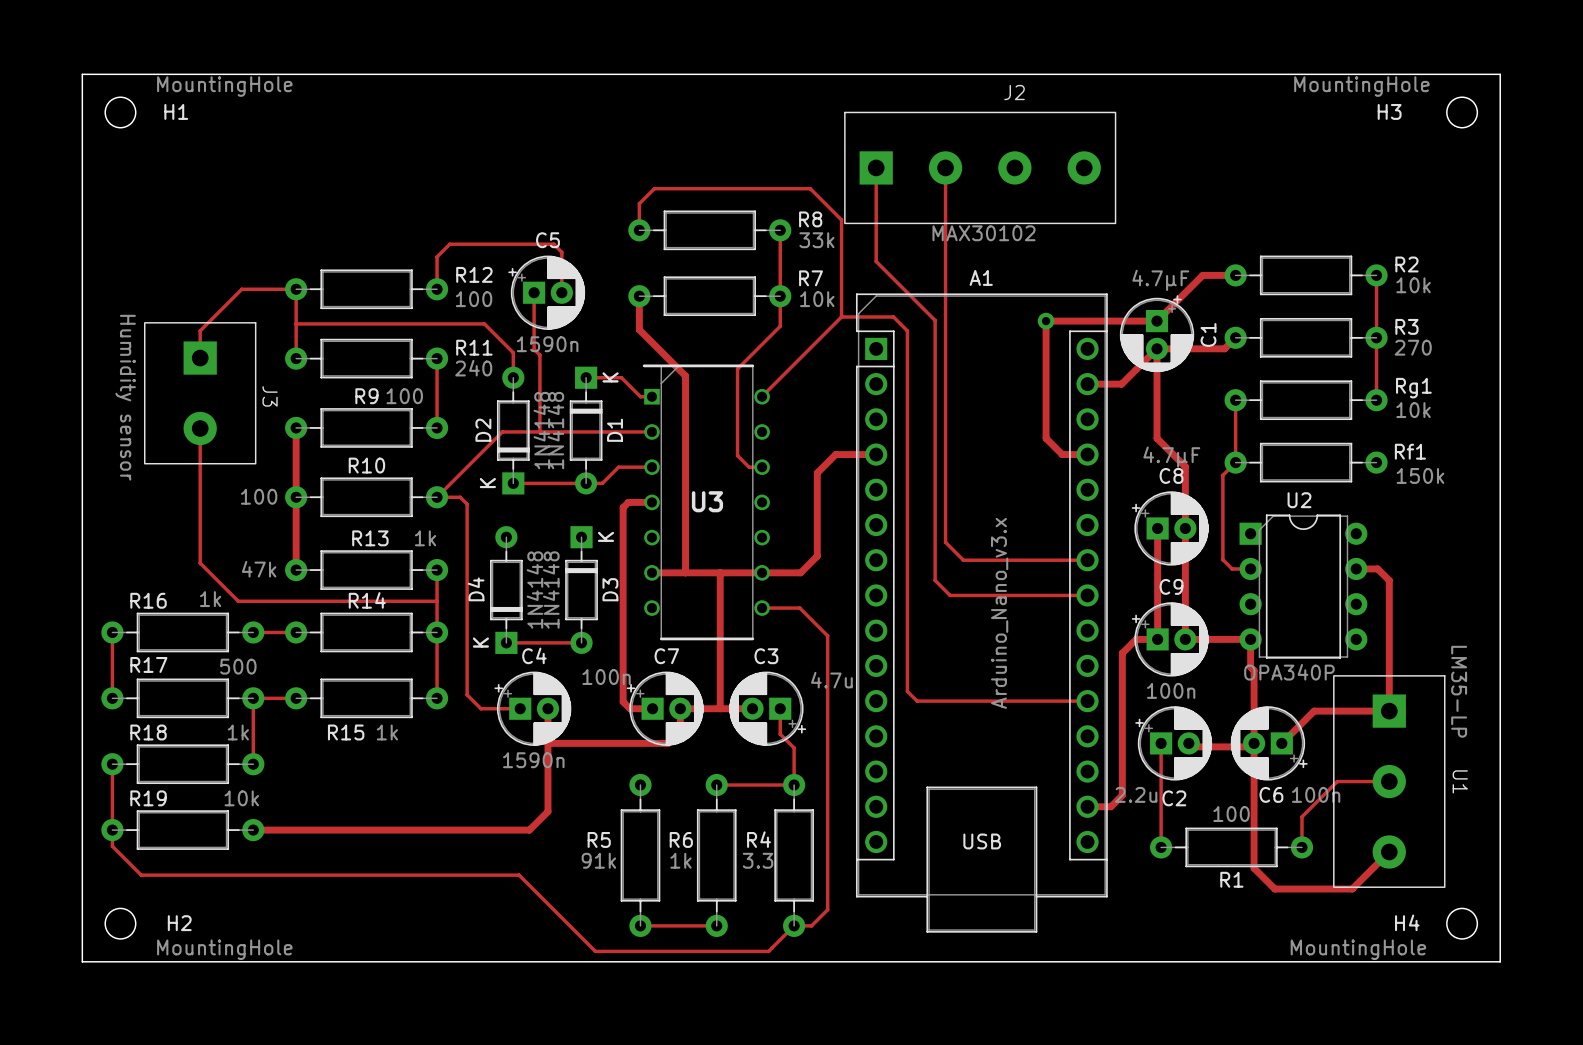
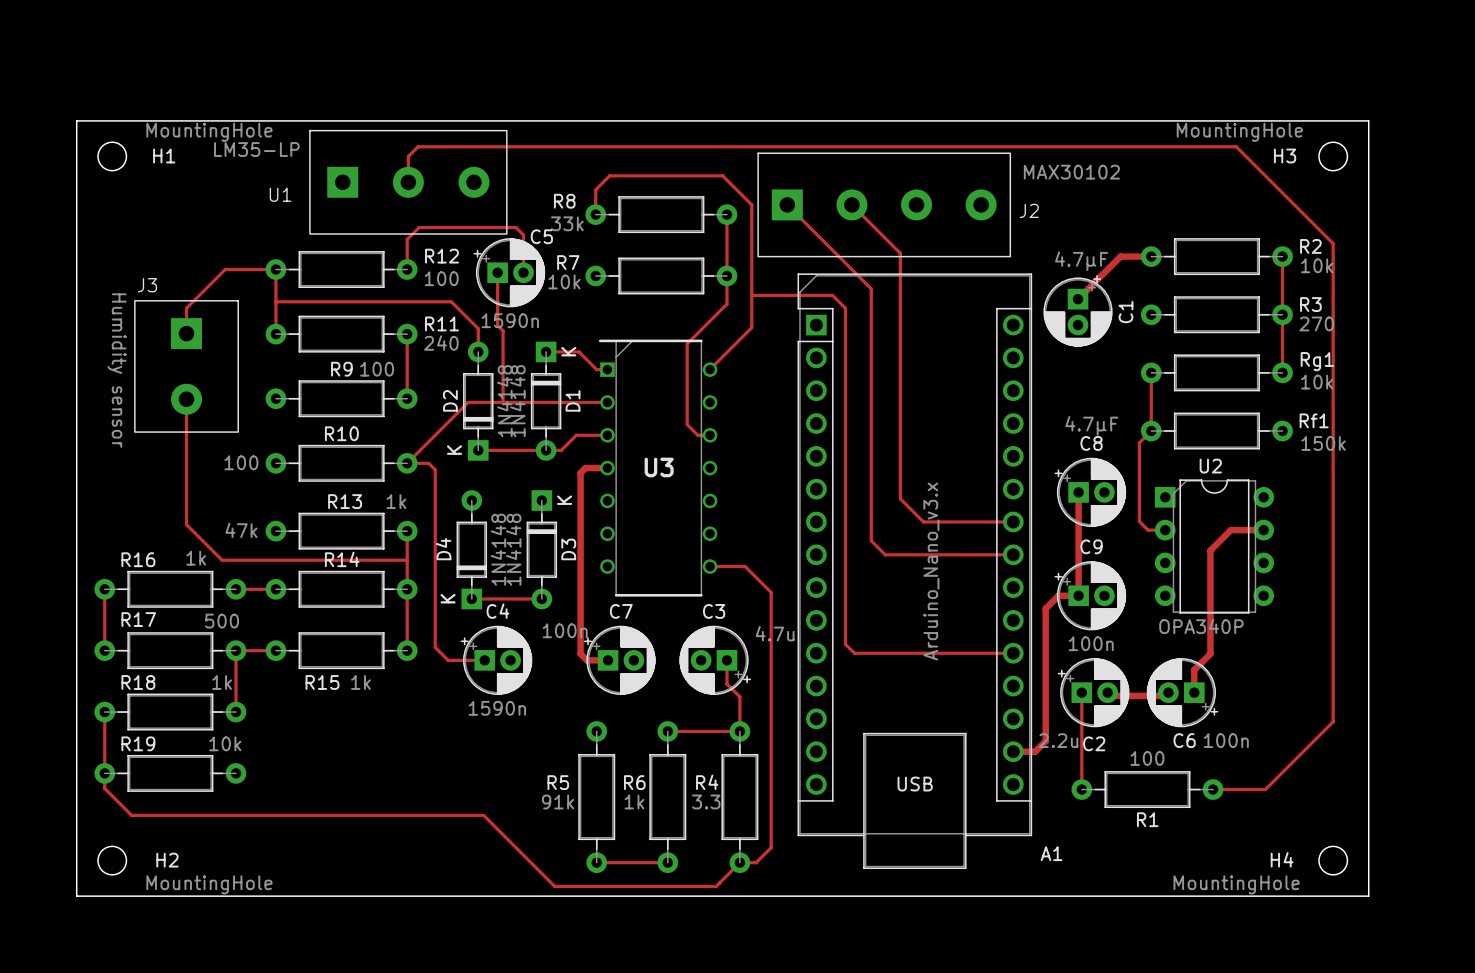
J2 name position: J2 (1014, 92) -> J2 (1029, 210)
H3 name position: H3 (1389, 111) -> H3 (1285, 155)
H1 position: (120, 112) -> (112, 156)
H3 position: (1462, 112) -> (1333, 156)
board edge: (82, 129) (82, 74) (1500, 74) (1500, 961) (1469, 961) -> (76, 120) (1368, 120) (1368, 896)
track: (876, 167) (876, 261) (935, 320) -> (787, 204) (871, 288) (871, 298)
track: (945, 167) (945, 542) (963, 560) (991, 560) -> (851, 204) (900, 253) (900, 498) (923, 521)
J2 position: (980, 167) -> (884, 204)
track: (775, 188) (810, 188) (841, 219) (841, 317) (806, 351) -> (722, 175) (751, 204) (751, 327)
R8 name position: R8 (810, 219) -> R8 (564, 201)
J2 value position: MAX30102 (984, 233) -> MAX30102 (1071, 172)
C5 name position: C5 (547, 240) -> C5 (541, 236)
R8 value position: 33k (816, 240) -> 33k (567, 223)
A1 name position: A1 (981, 277) -> A1 (1051, 853)
R7 name position: R7 (811, 278) -> R7 (568, 262)
track: (639, 296) (639, 329) (685, 375) (685, 572) -> none
R7 value position: 10k (817, 299) -> 10k (564, 281)
track: none -> (751, 295) (784, 295)
via: (1046, 321) -> none
track: (1157, 321) (1046, 321) (1046, 438) (1062, 454) (1087, 454) -> none
track: (1235, 337) (1224, 348) (1157, 348) -> none
track: (1157, 348) (1121, 384) (1087, 384) -> none
track: (1157, 348) (1157, 438) (1185, 466) (1185, 639) (1250, 639) (1250, 667) (1254, 670) (1254, 868) (1274, 889) (1352, 889) (1389, 851) -> none
J3 name rotation: 0° (270, 396) -> 90° counterclockwise (147, 285)
J3 name position: J3 (270, 396) -> J3 (147, 285)
track: (296, 427) (296, 570) -> none
track: (876, 454) (835, 454) (817, 473) (817, 556) (800, 572) (651, 572) -> none
track: (1356, 568) (1377, 568) (1389, 580) (1389, 711) (1314, 711) (1281, 743) -> (1263, 530) (1230, 530) (1210, 550) (1210, 653) (1194, 670) (1194, 692)
track: (720, 572) (720, 708) -> none
U1 value position: LM35-LP (1459, 691) -> LM35-LP (256, 149)
track: (547, 708) (547, 811) (529, 830) (253, 830) -> none
track: (752, 708) (680, 708) (680, 731) (668, 743) (547, 743) -> none
track: (1389, 781) (1337, 781) (1301, 816) (1301, 847) -> (408, 182) (408, 156) (418, 146) (1236, 146) (1333, 243) (1333, 721) (1265, 789) (1213, 789)
U1 rotation: 0° (1389, 781) -> 90° counterclockwise (408, 182)
U1 position: (1389, 781) -> (408, 182)
U1 name position: U1 (1460, 781) -> U1 (280, 194)
H4 position: (1462, 923) -> (1333, 860)

